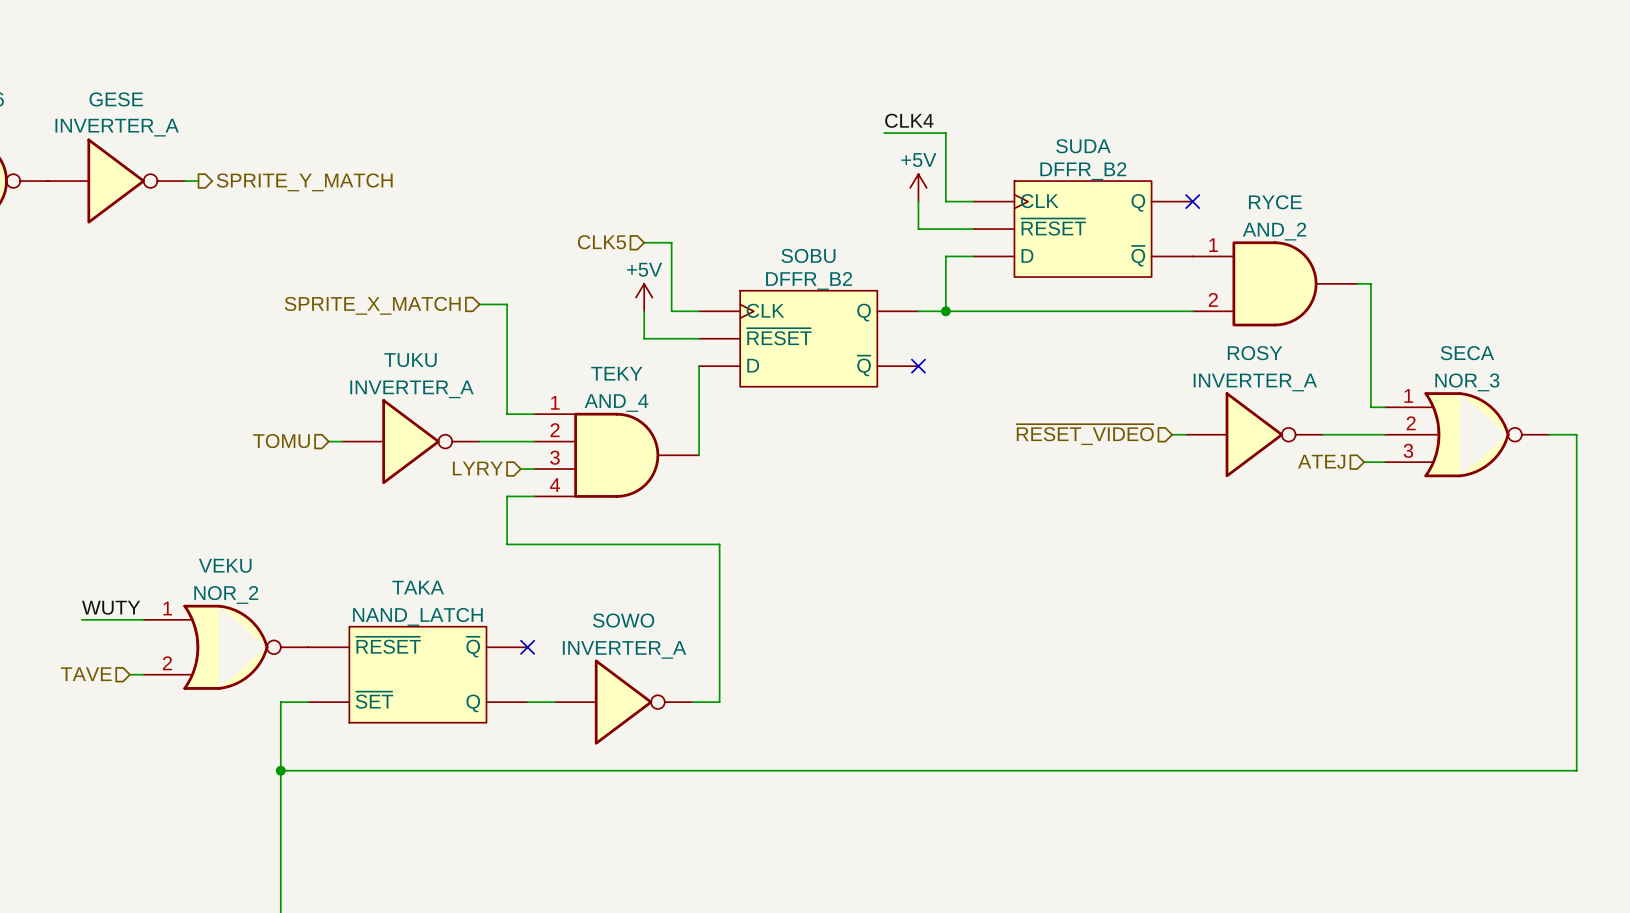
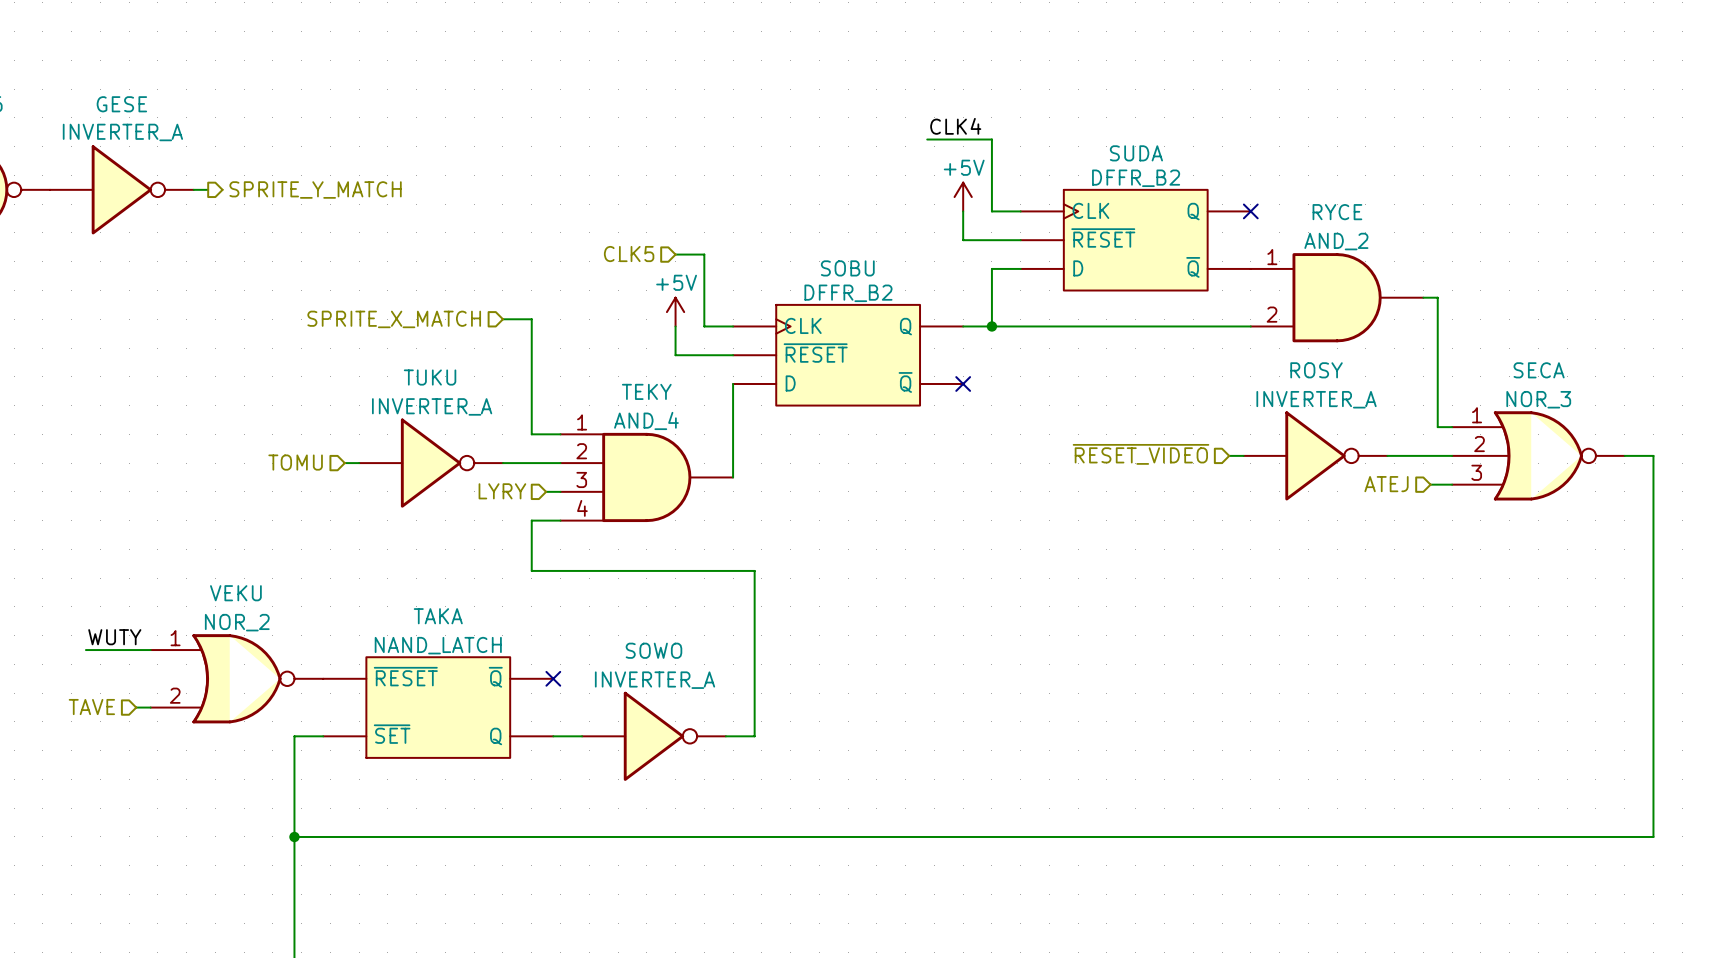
wire: (280, 770) (1576, 770) -> (294, 836) (1653, 836) (1653, 808)
junction position: (280, 770) -> (294, 836)

